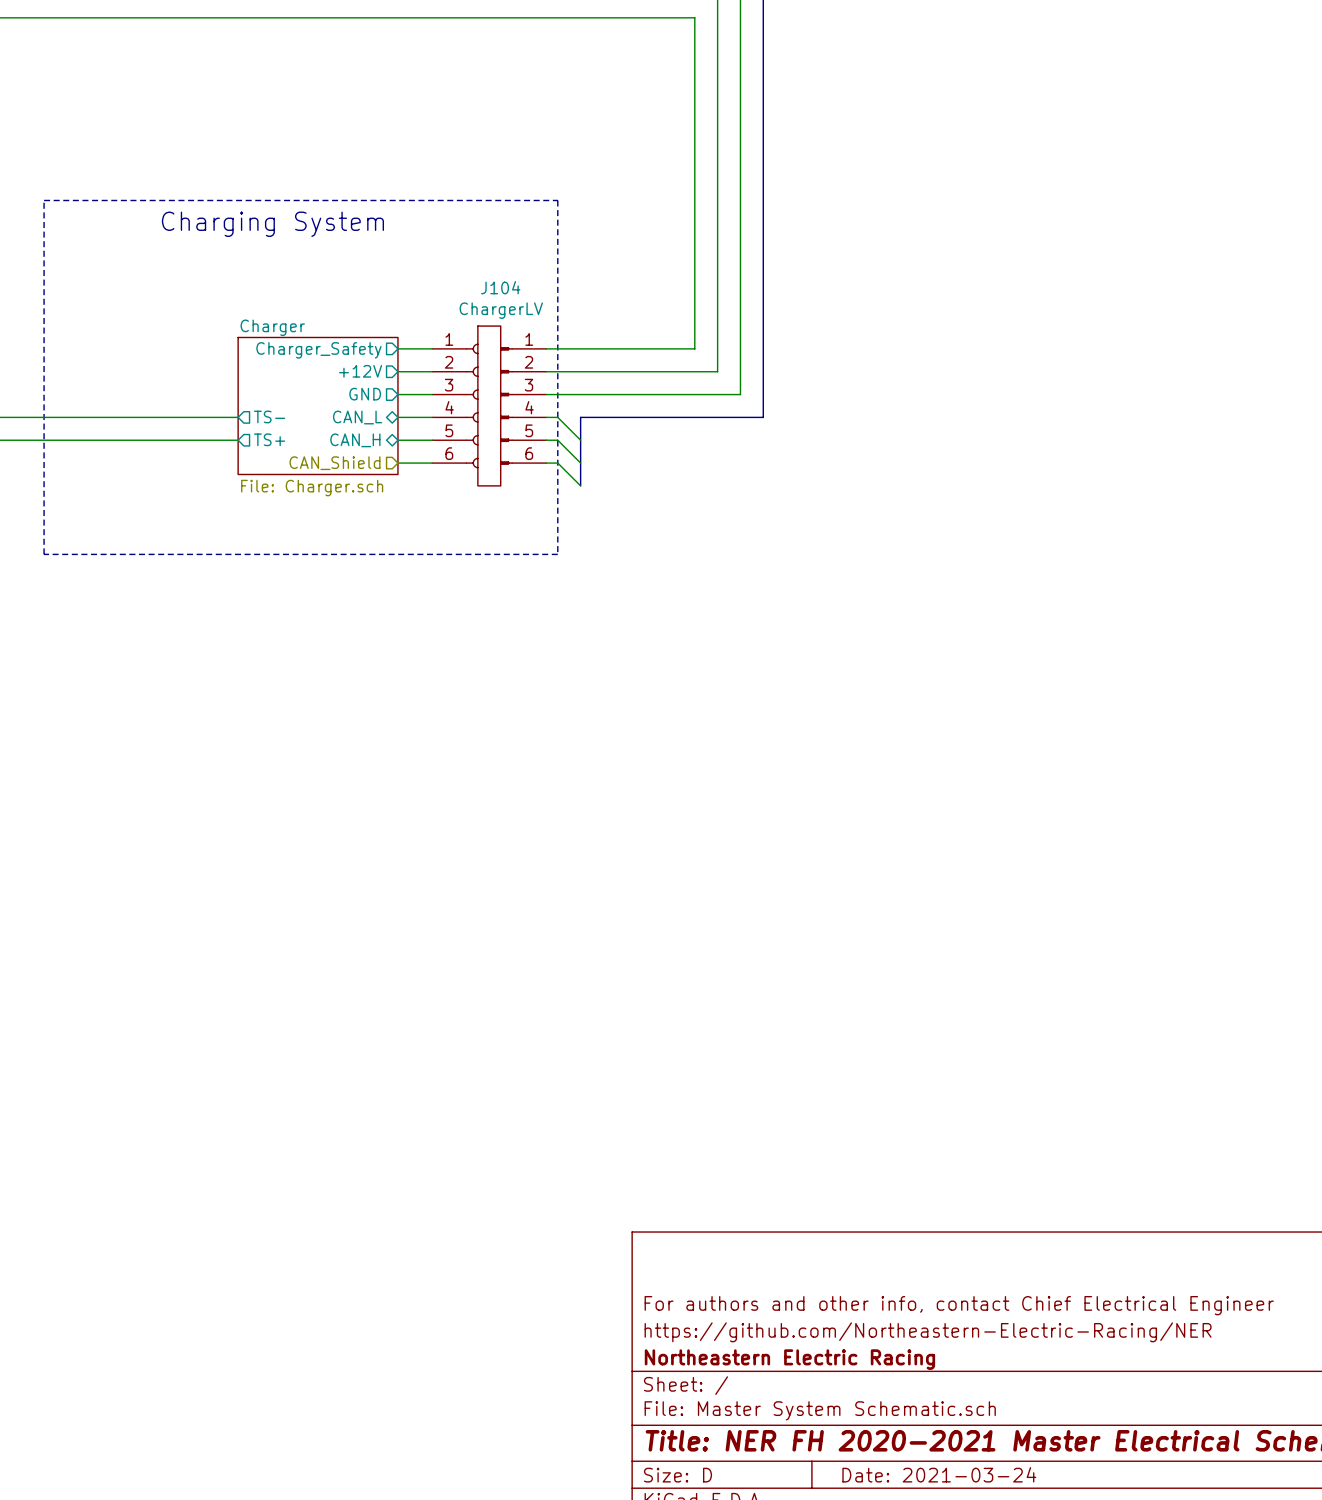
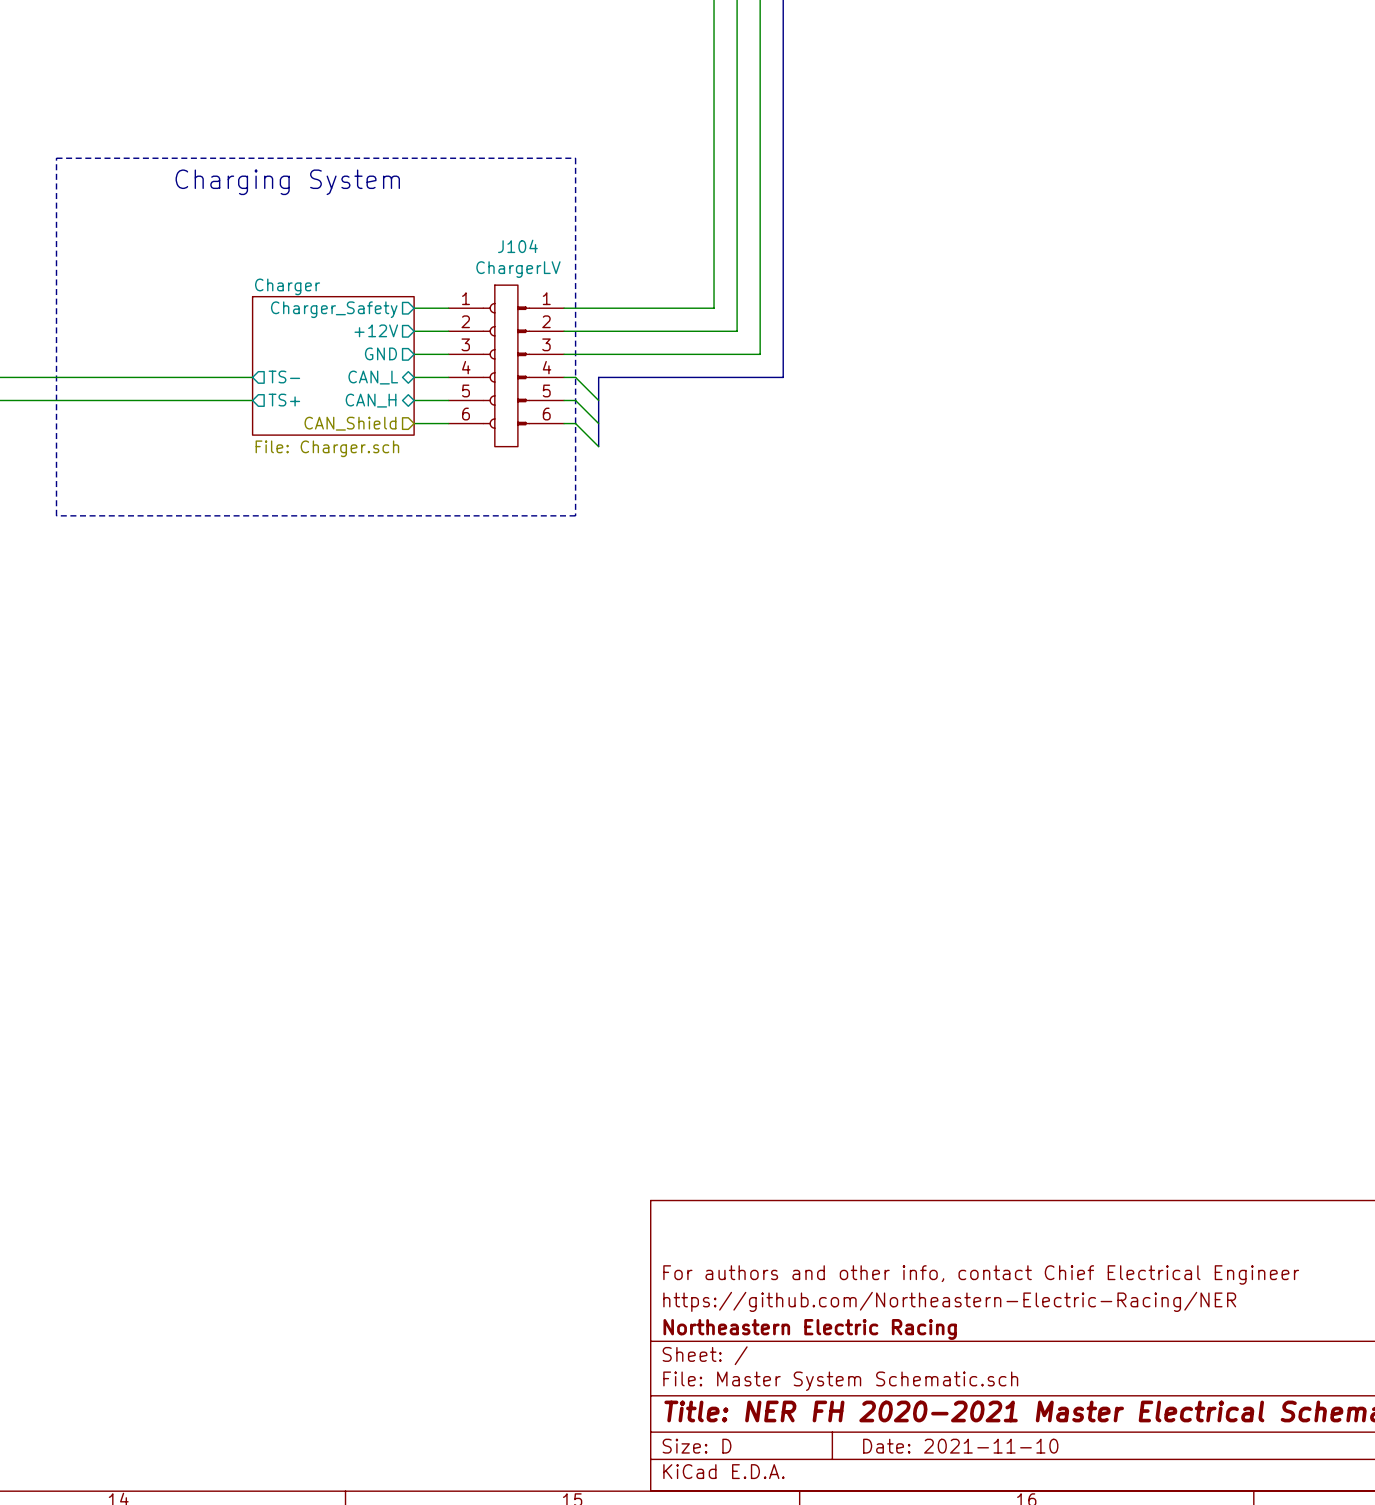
title block: Date: 2021-03-24 (939, 1474) -> Date: 2021-11-10 (960, 1446)

